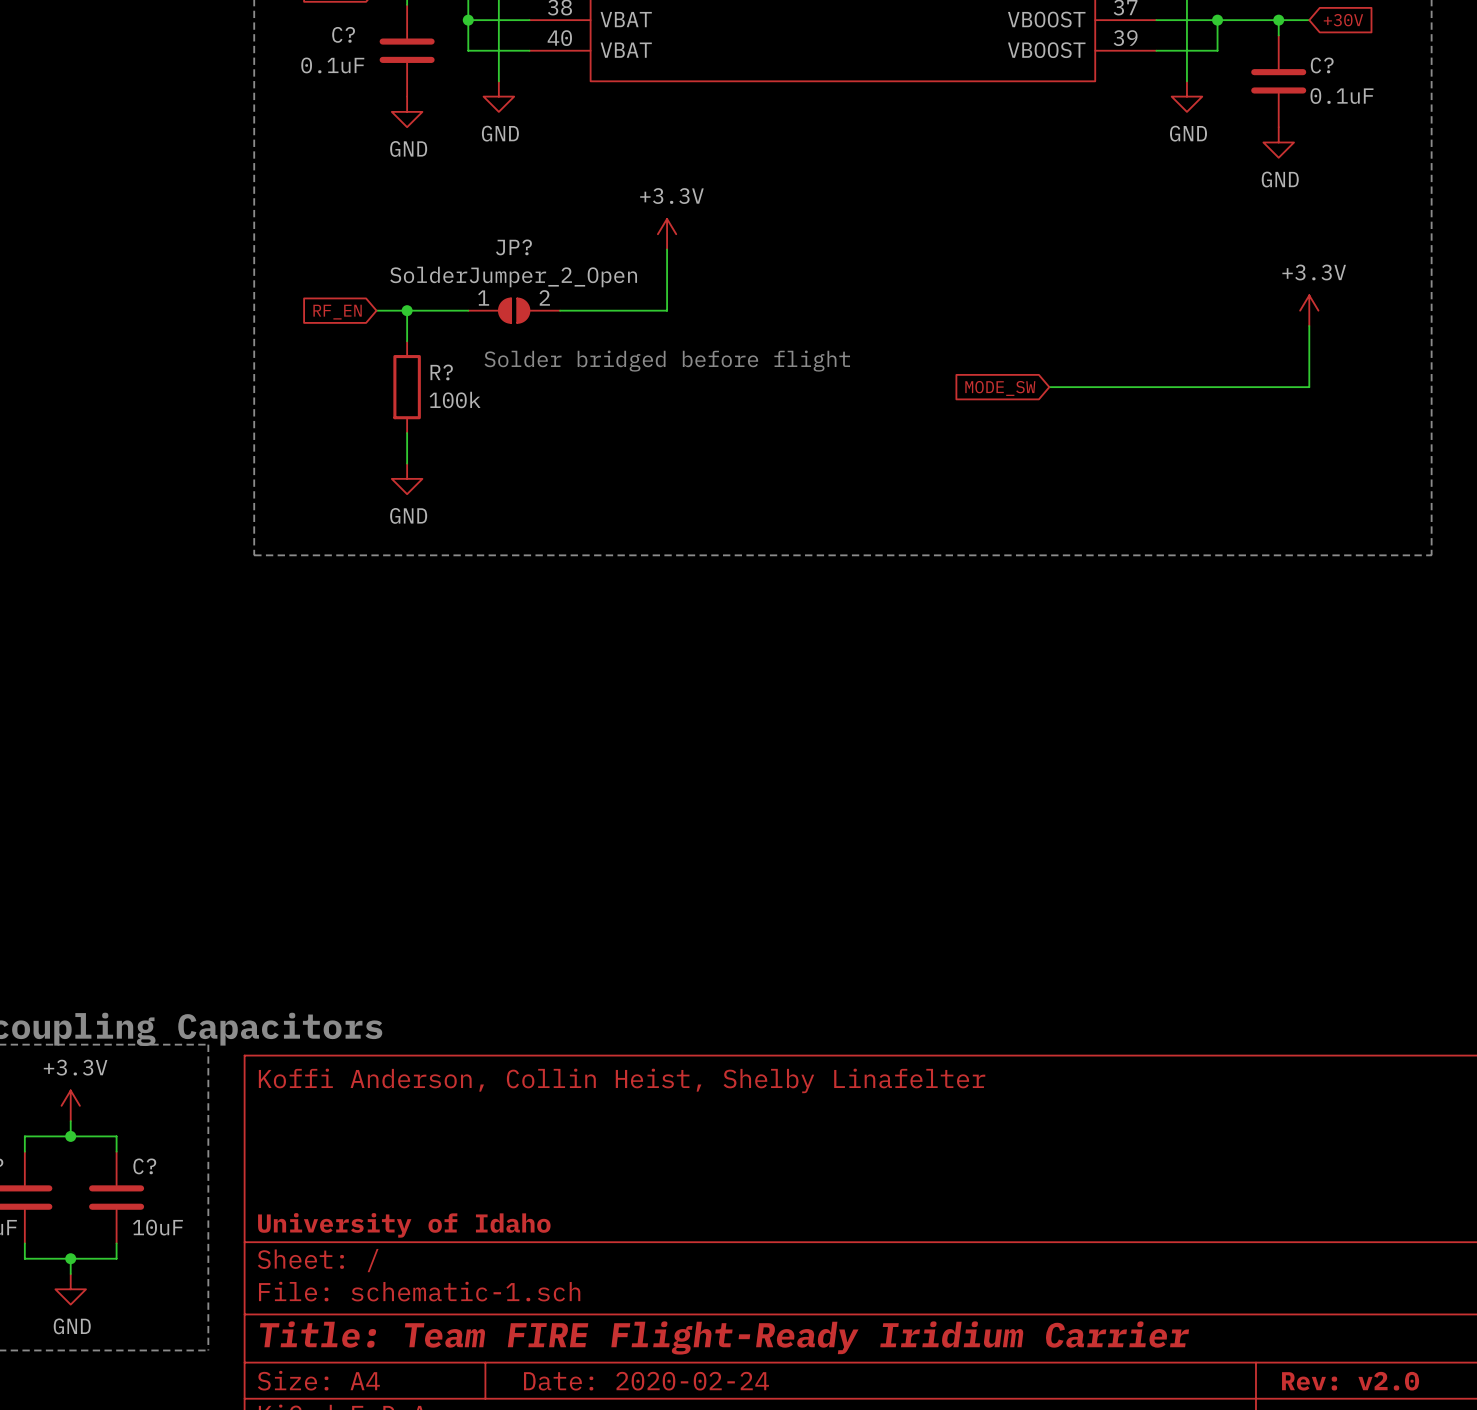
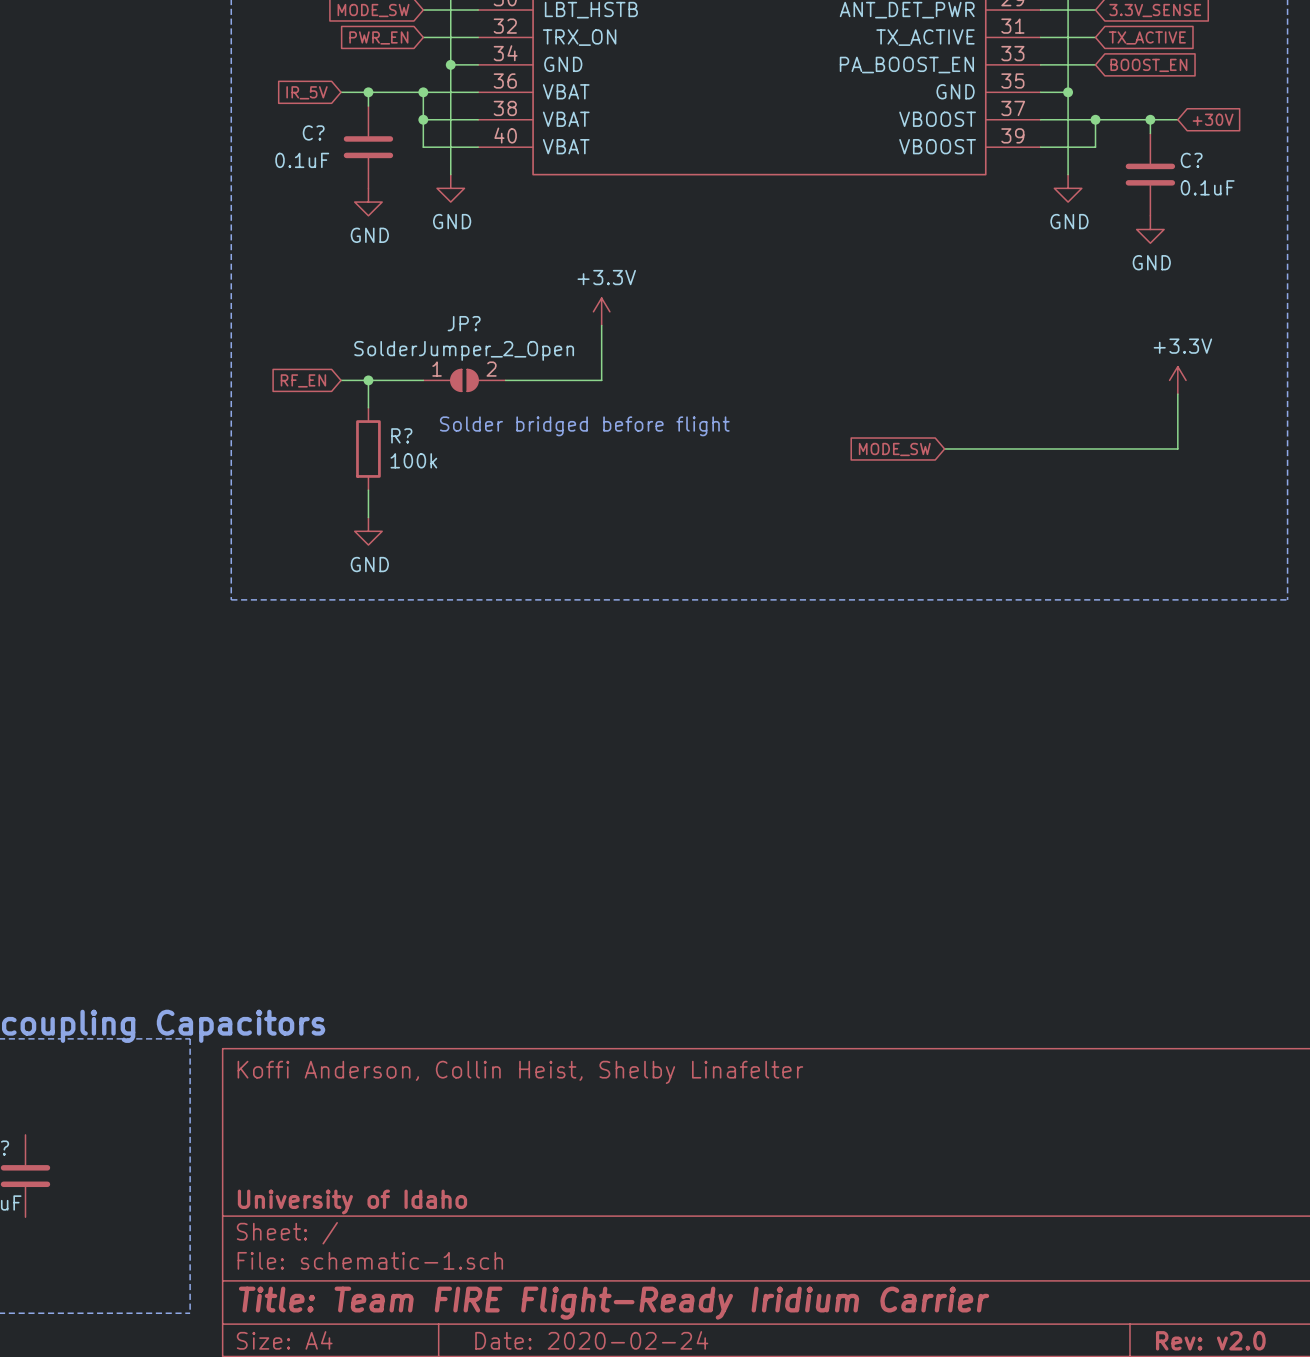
power symbol: +3.3V (70, 1105) -> none
wire: (70, 1121) (70, 1136) -> none
junction: (70, 1136) -> none
wire: (24, 1151) (24, 1136) (116, 1136) (116, 1151) -> none
C?: 10uF (116, 1197) -> none
wire: (24, 1243) (24, 1258) (116, 1258) (116, 1243) -> none
wire: (70, 1258) (70, 1274) -> none
junction: (70, 1258) -> none
power symbol: GND (70, 1289) -> none

